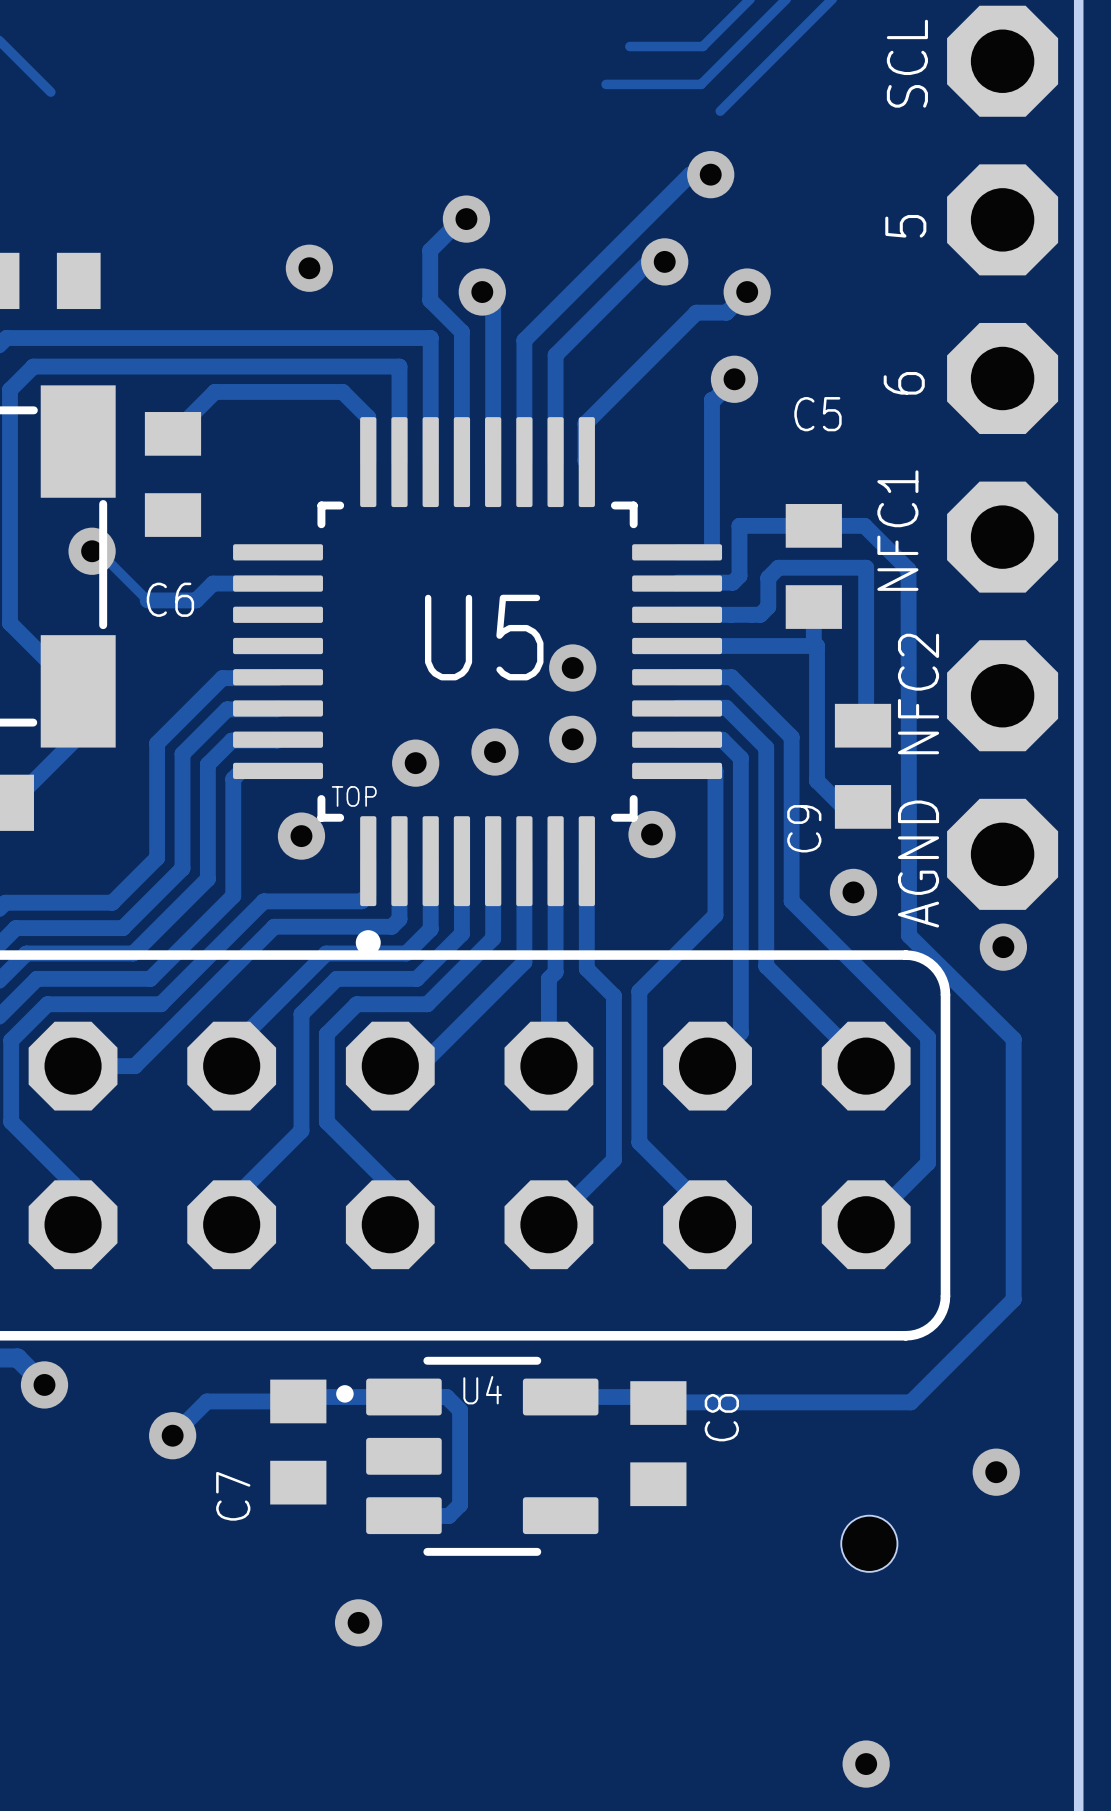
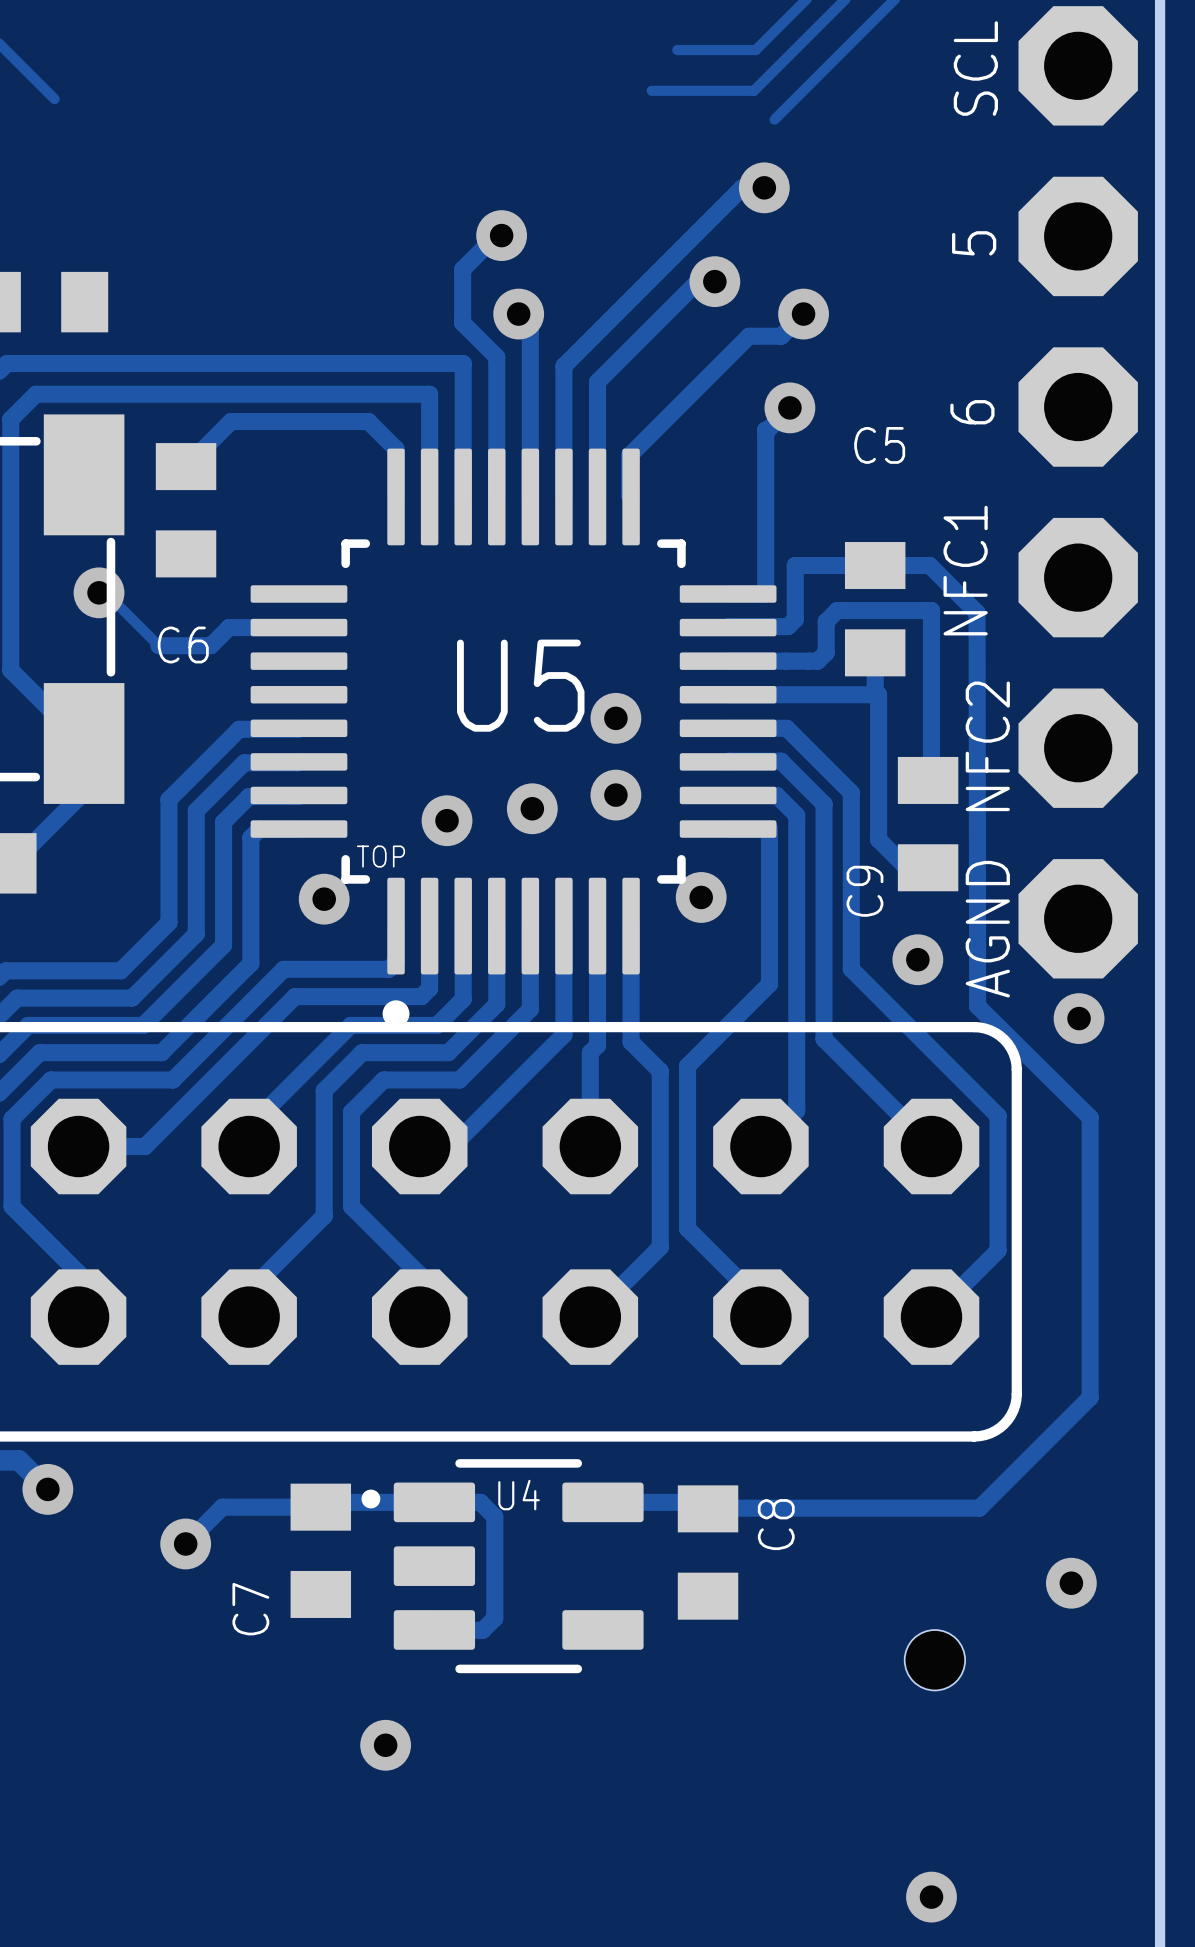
via: (309, 268) -> none

